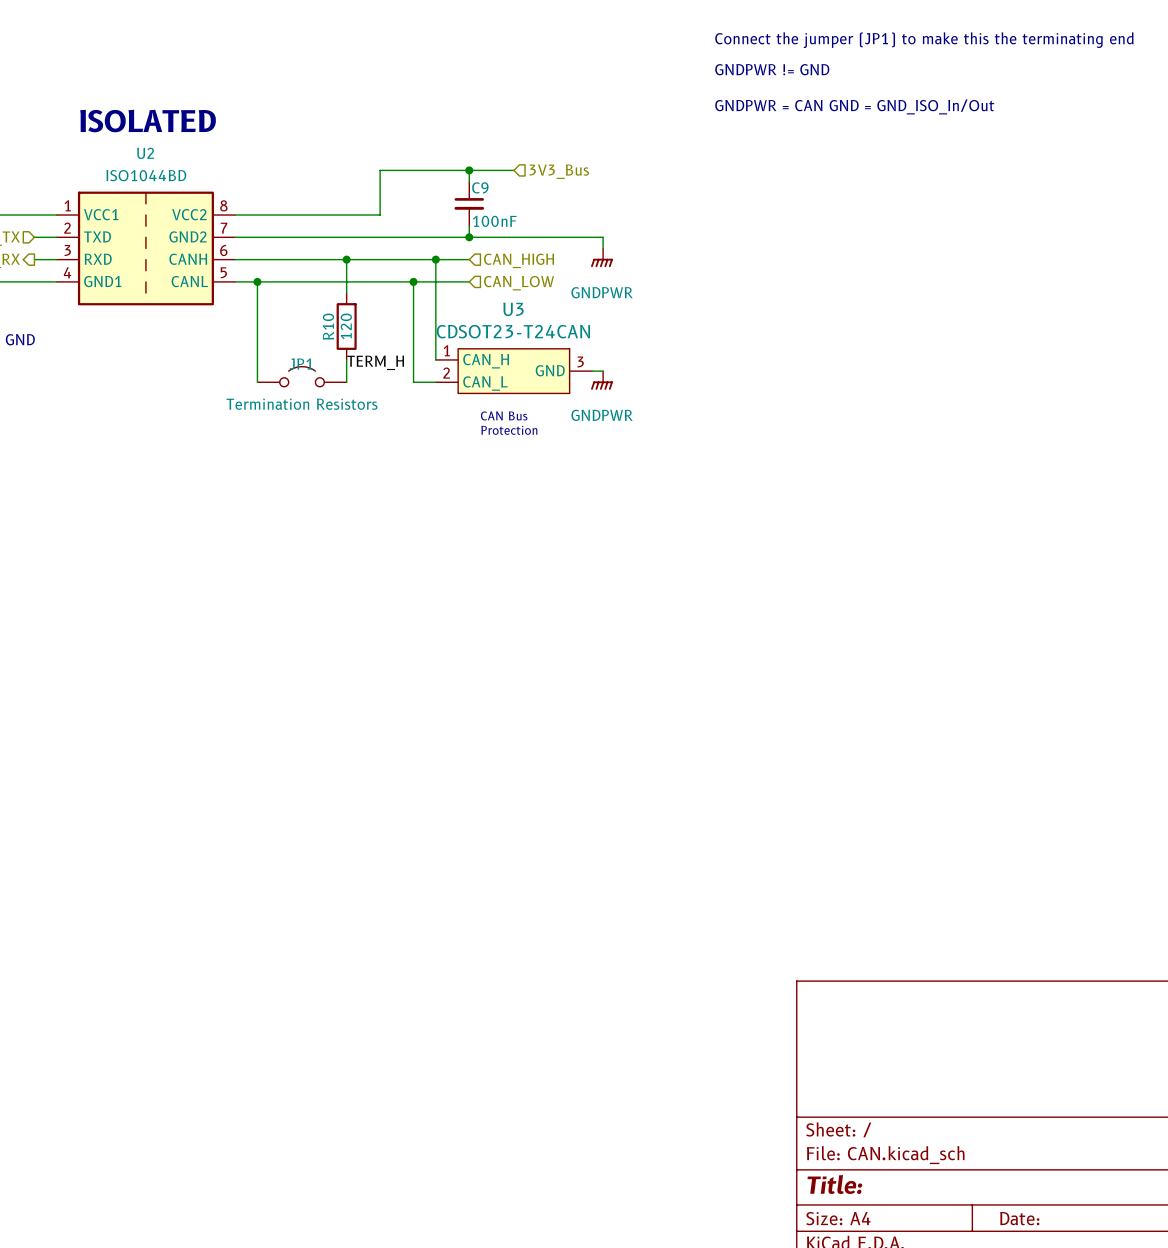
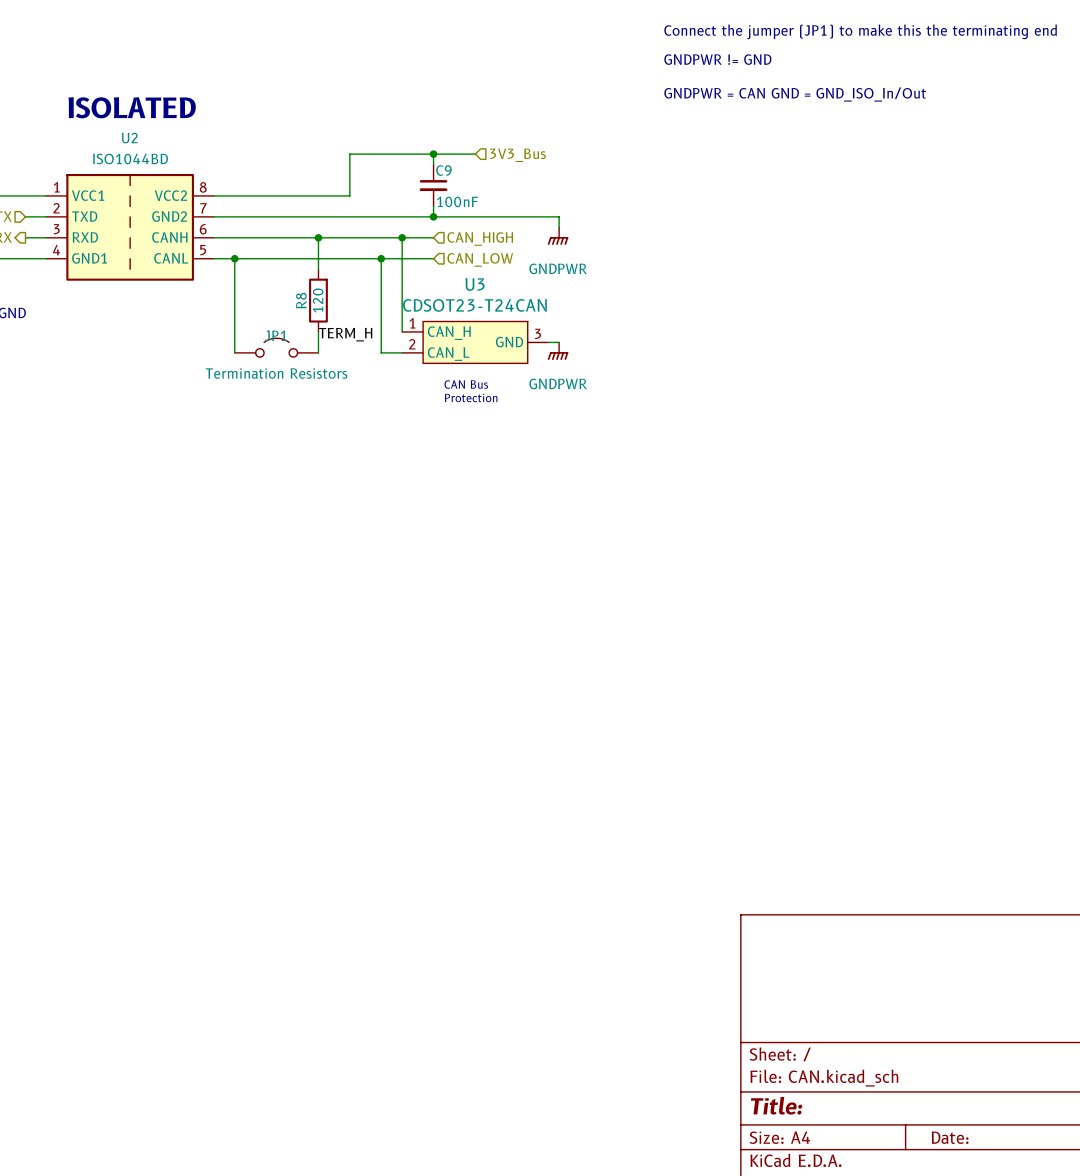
R10 name: R10 (328, 326) -> R8 (301, 300)

